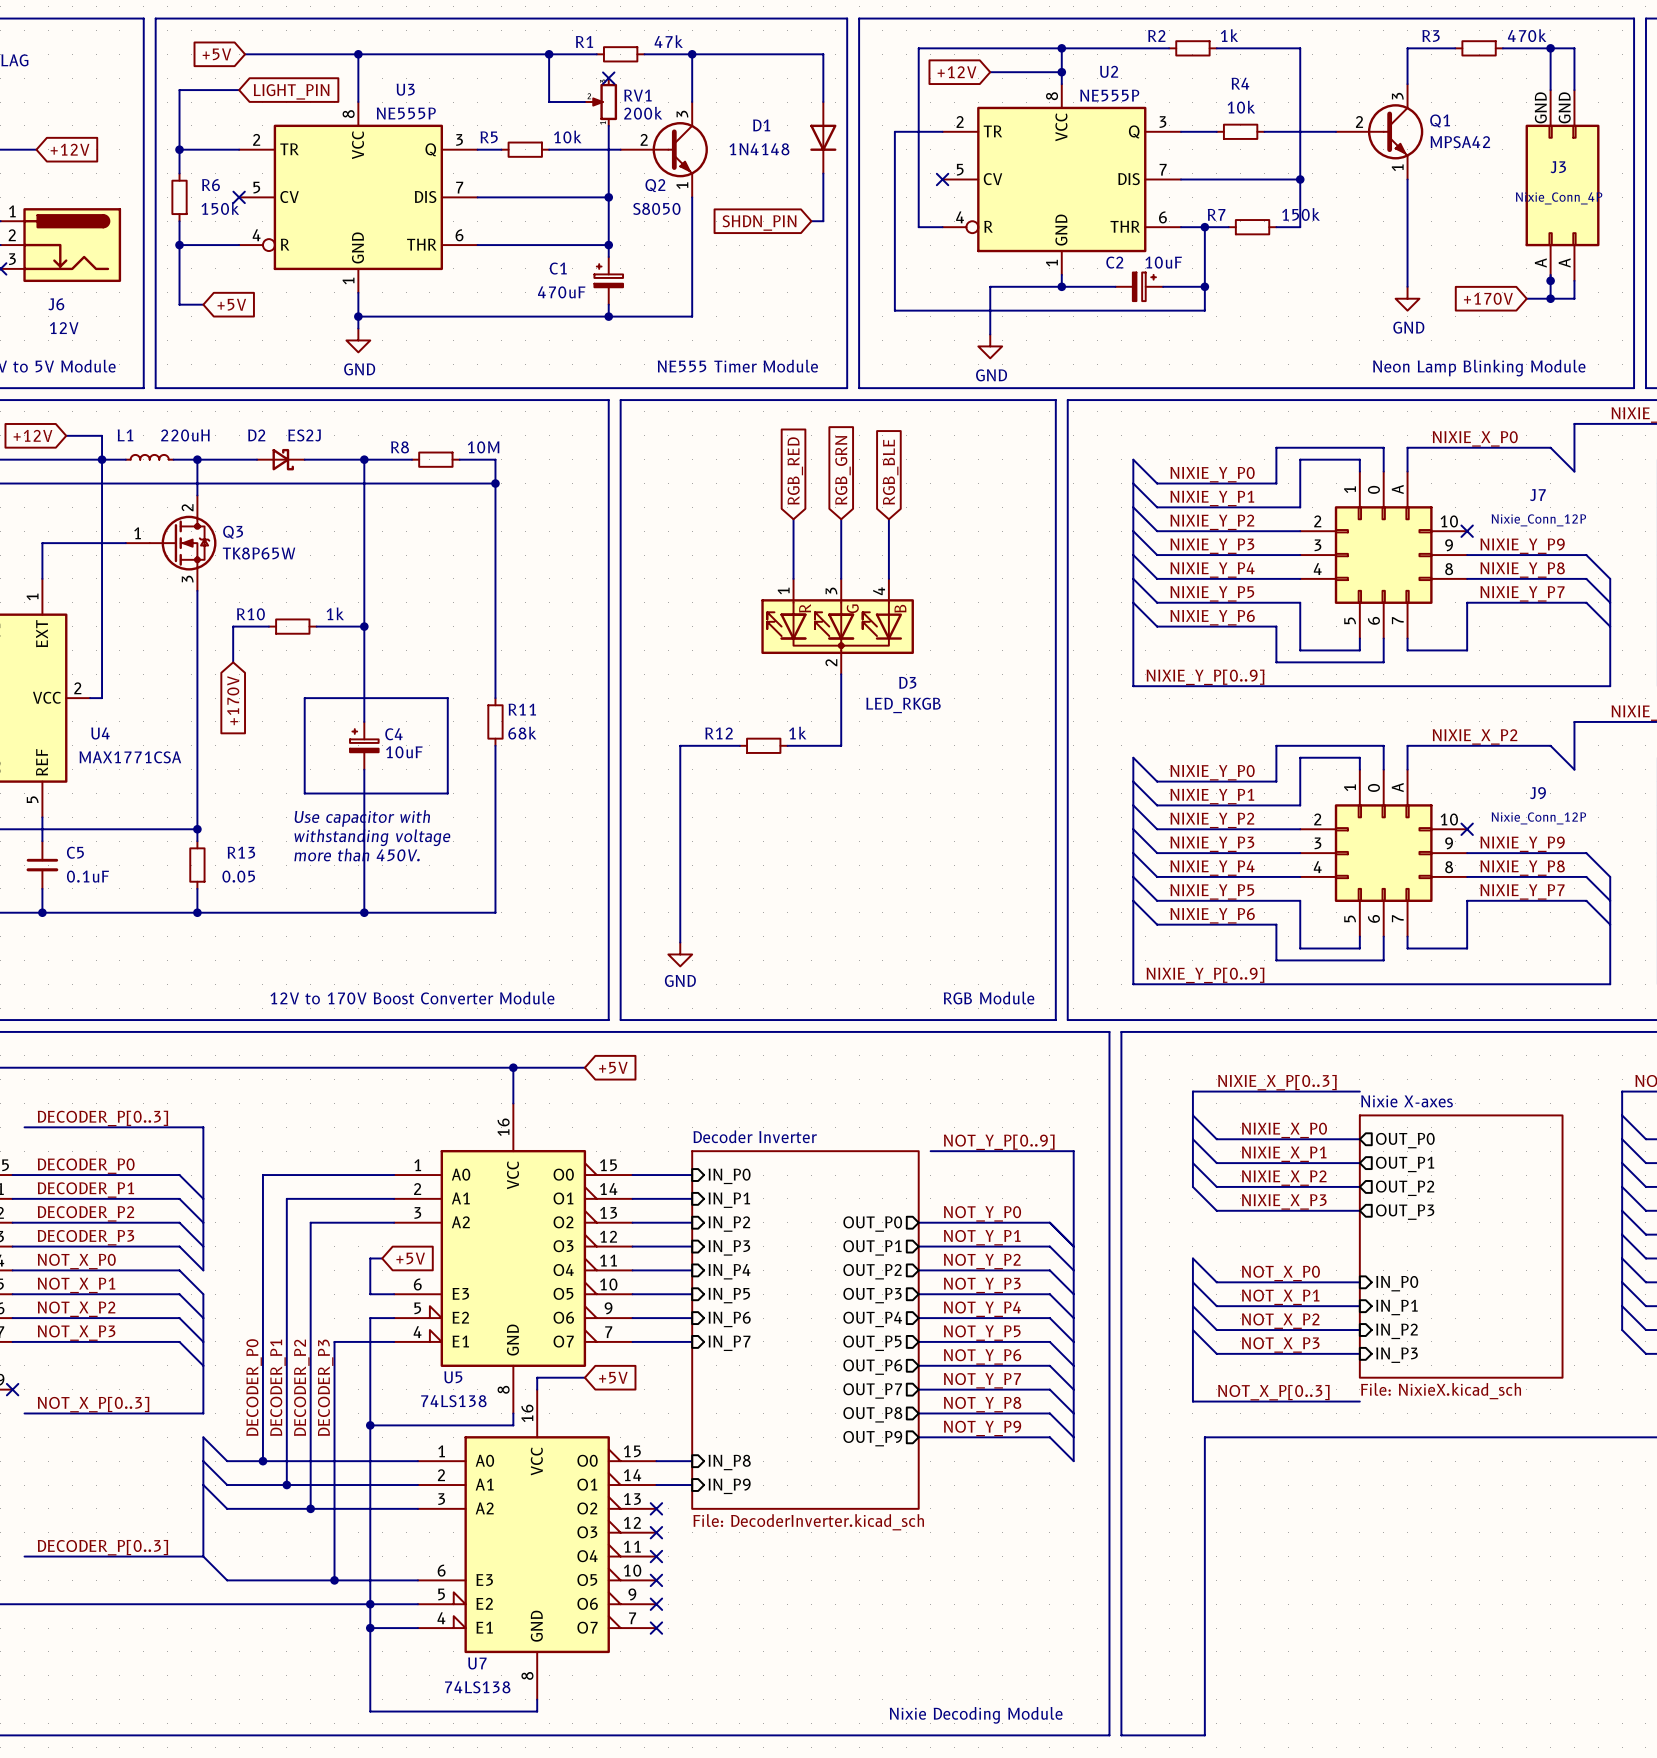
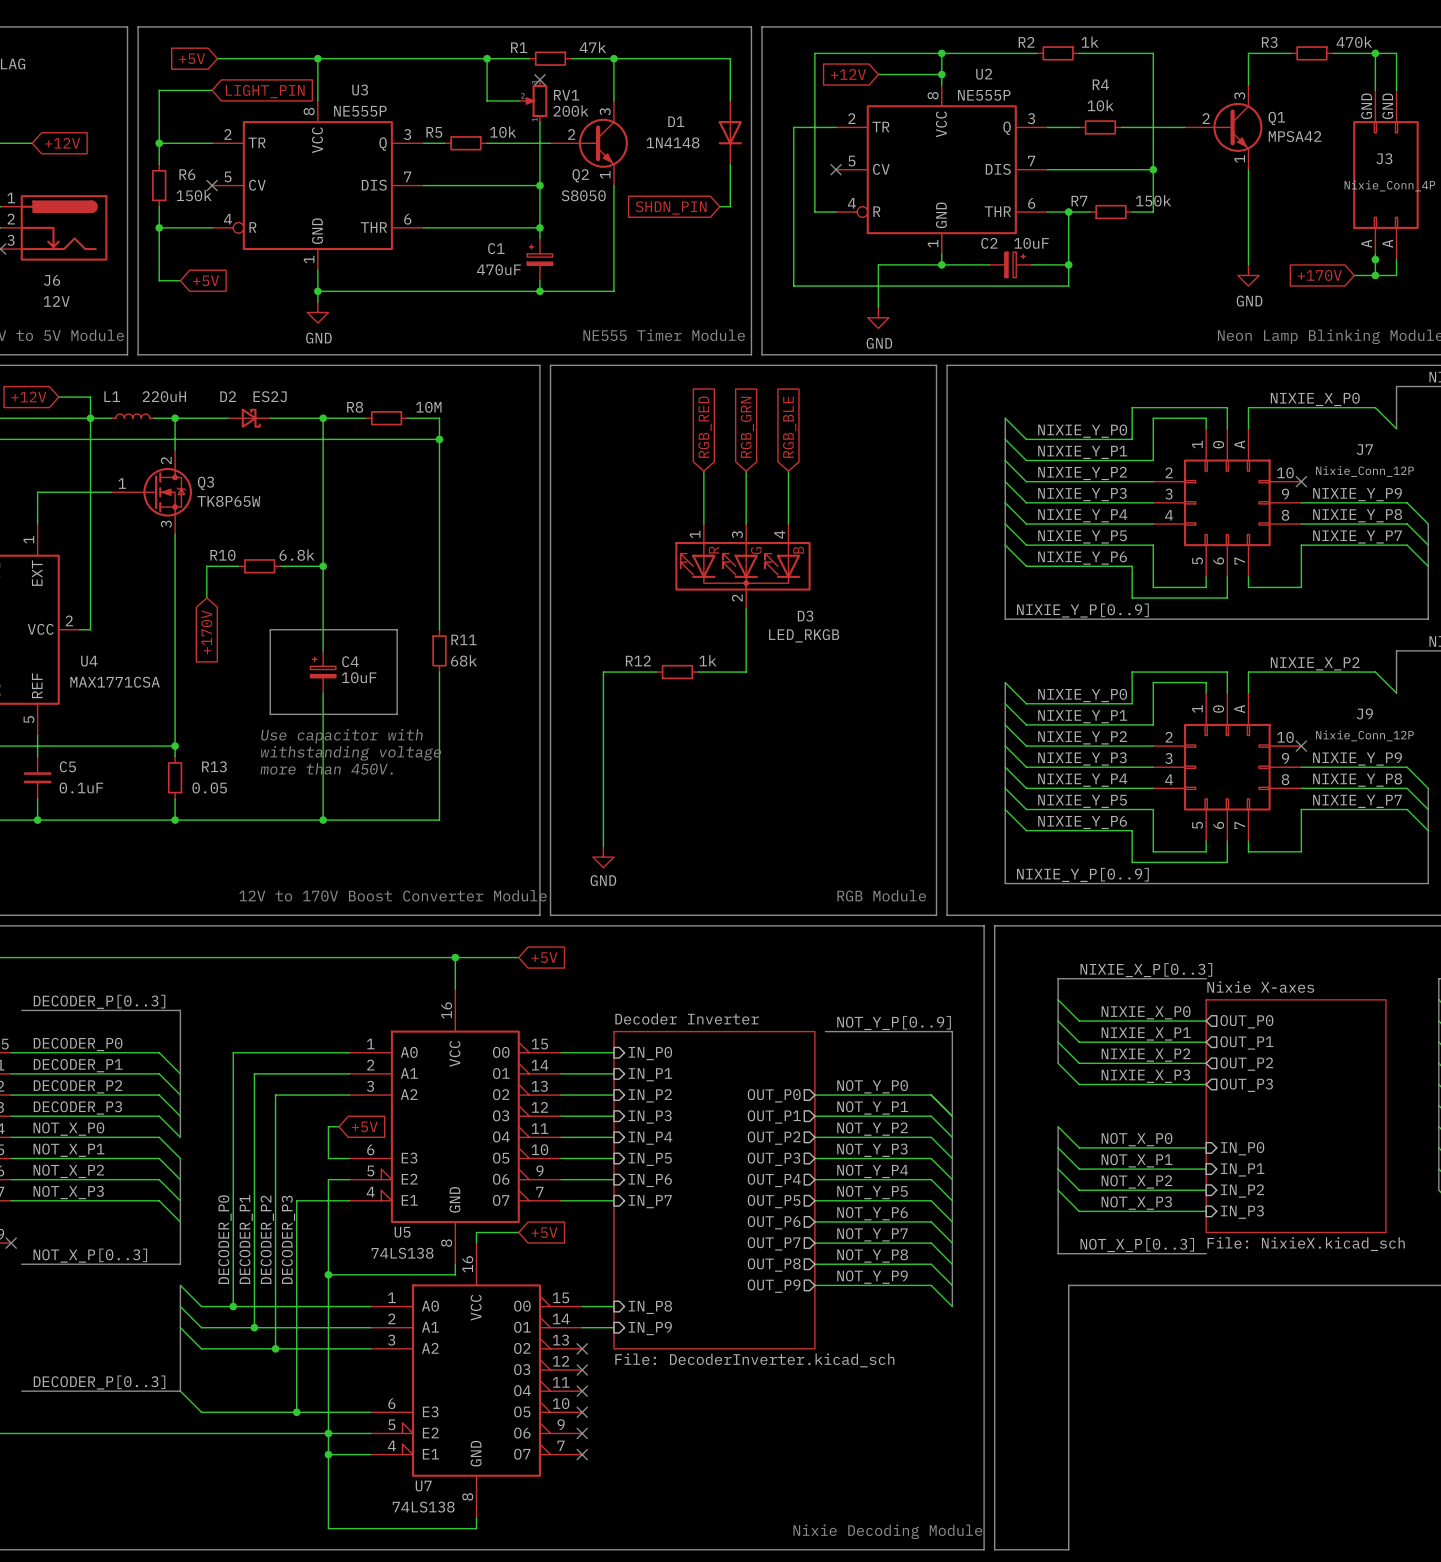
R10 value: 1k (335, 613) -> 6.8k (297, 555)

